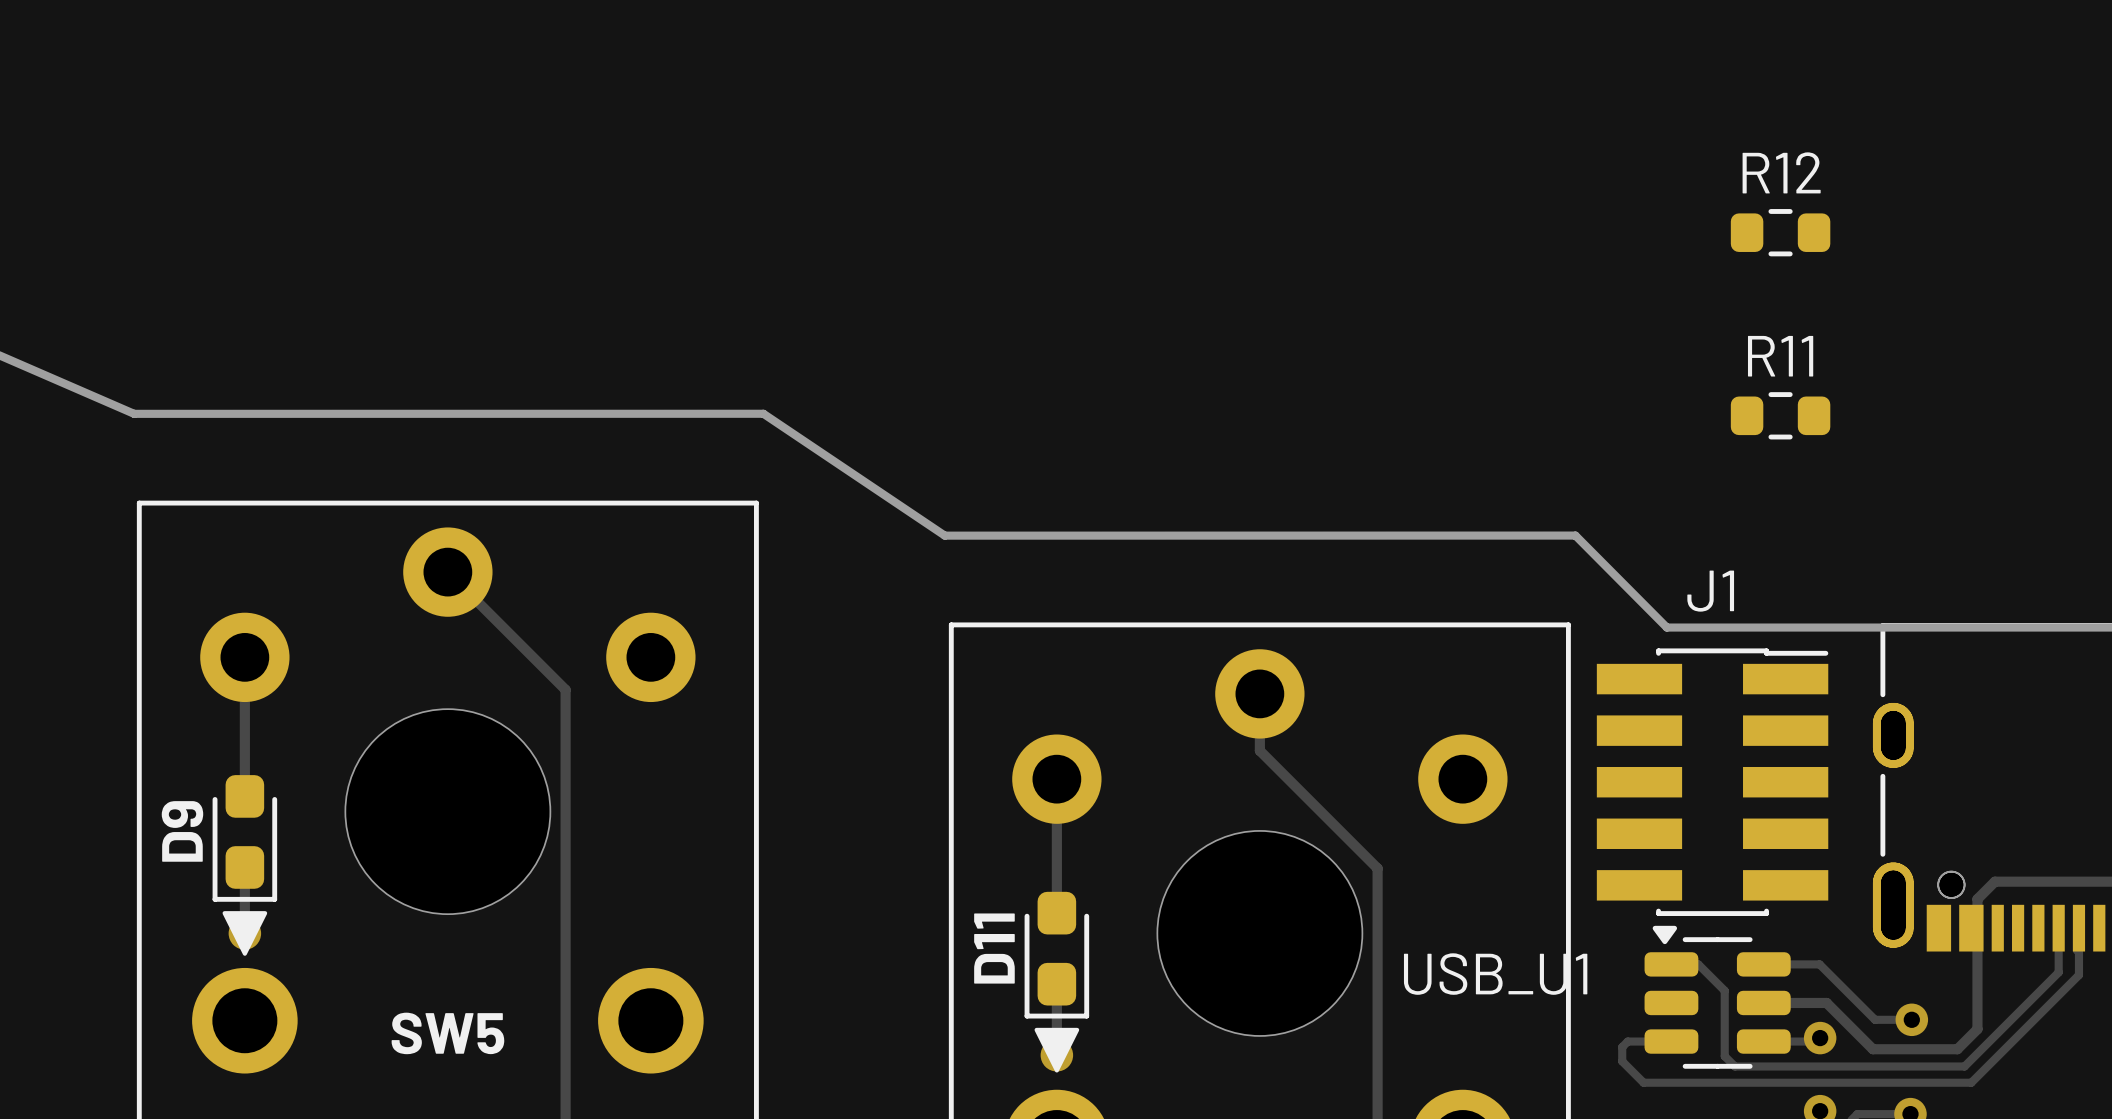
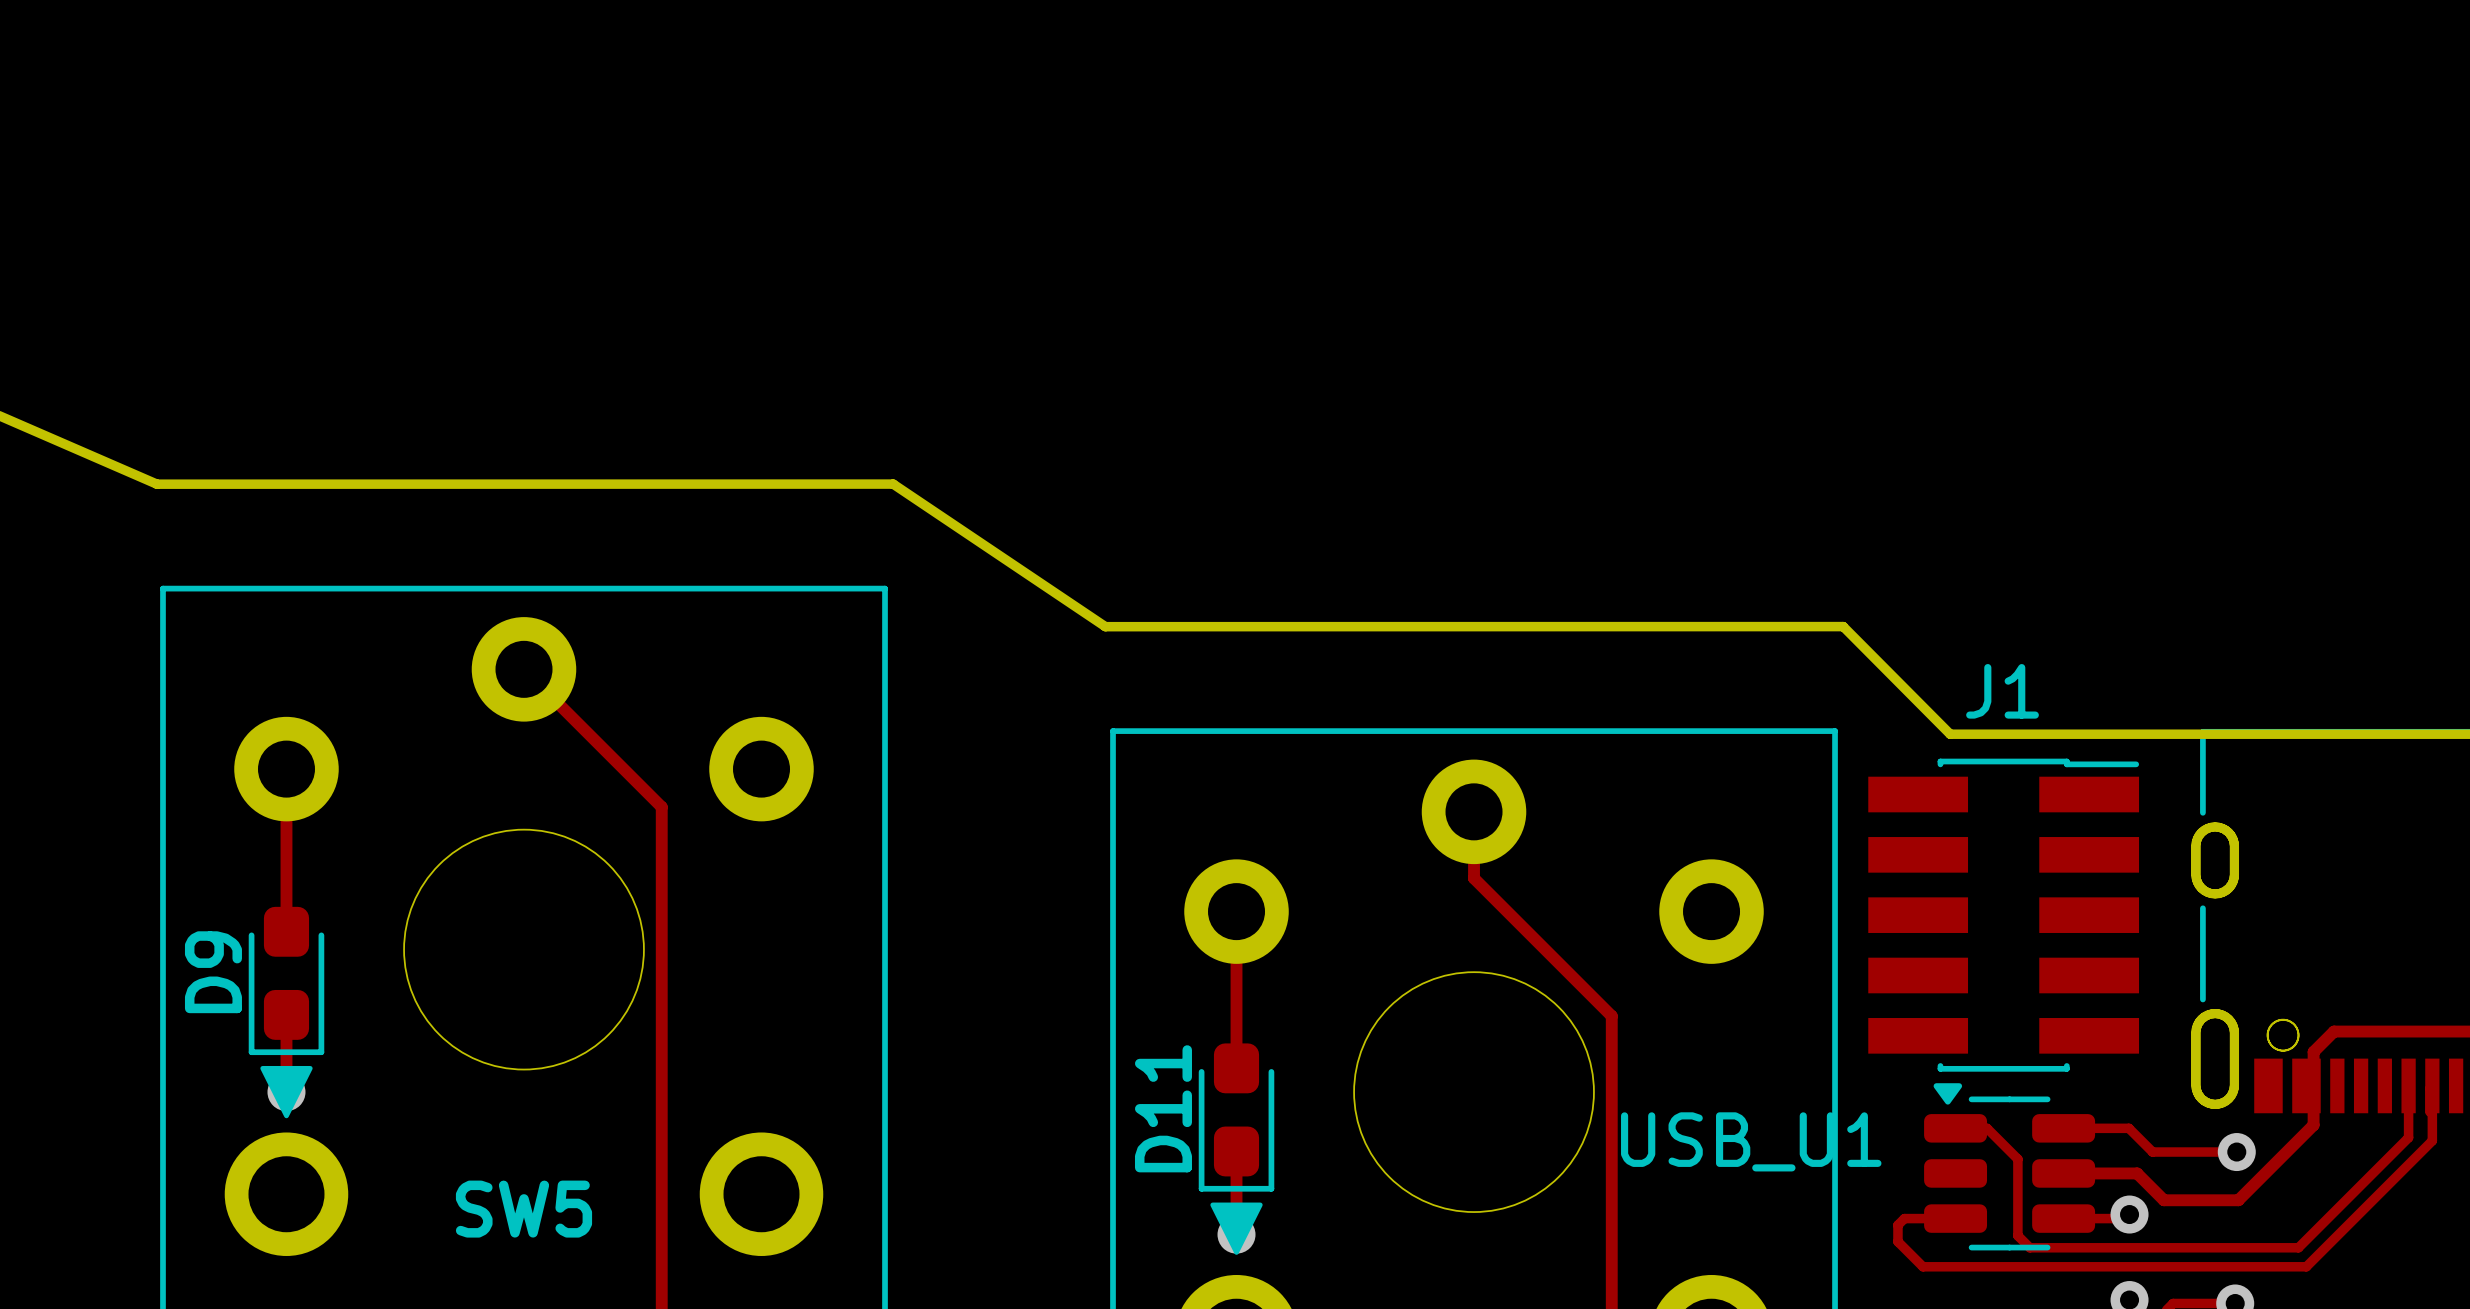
R12: (1780, 232) -> none
R11: (1780, 415) -> none
track: (1977, 961) (1977, 1029) (1957, 1049) (1872, 1049) (1849, 1025) -> (2313, 1125) (2238, 1200) (2163, 1200)
track: (1839, 984) (1875, 1019) (1911, 1019) -> (2152, 1152) (2236, 1152)
via position: (1911, 1019) -> (2236, 1152)

